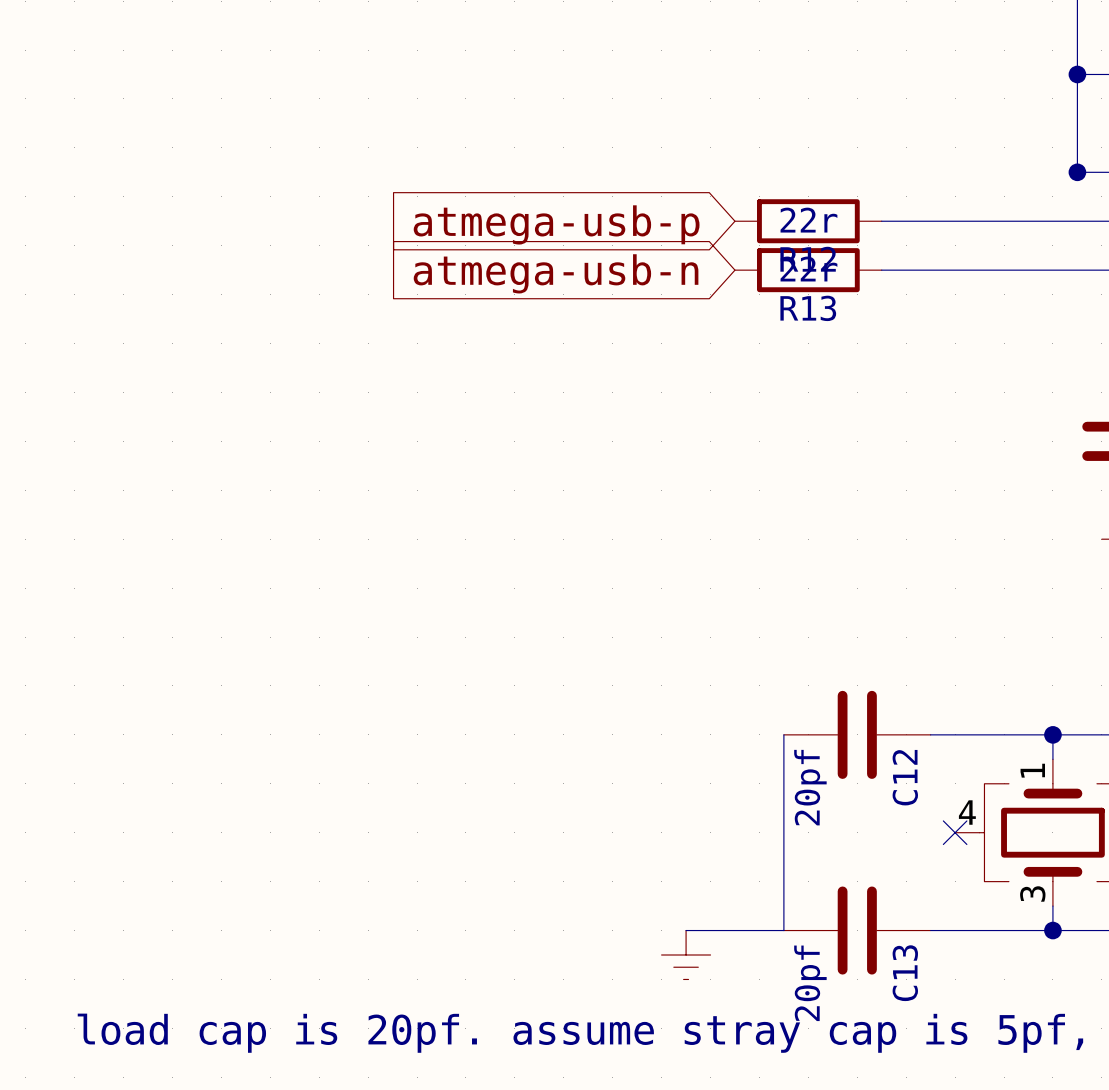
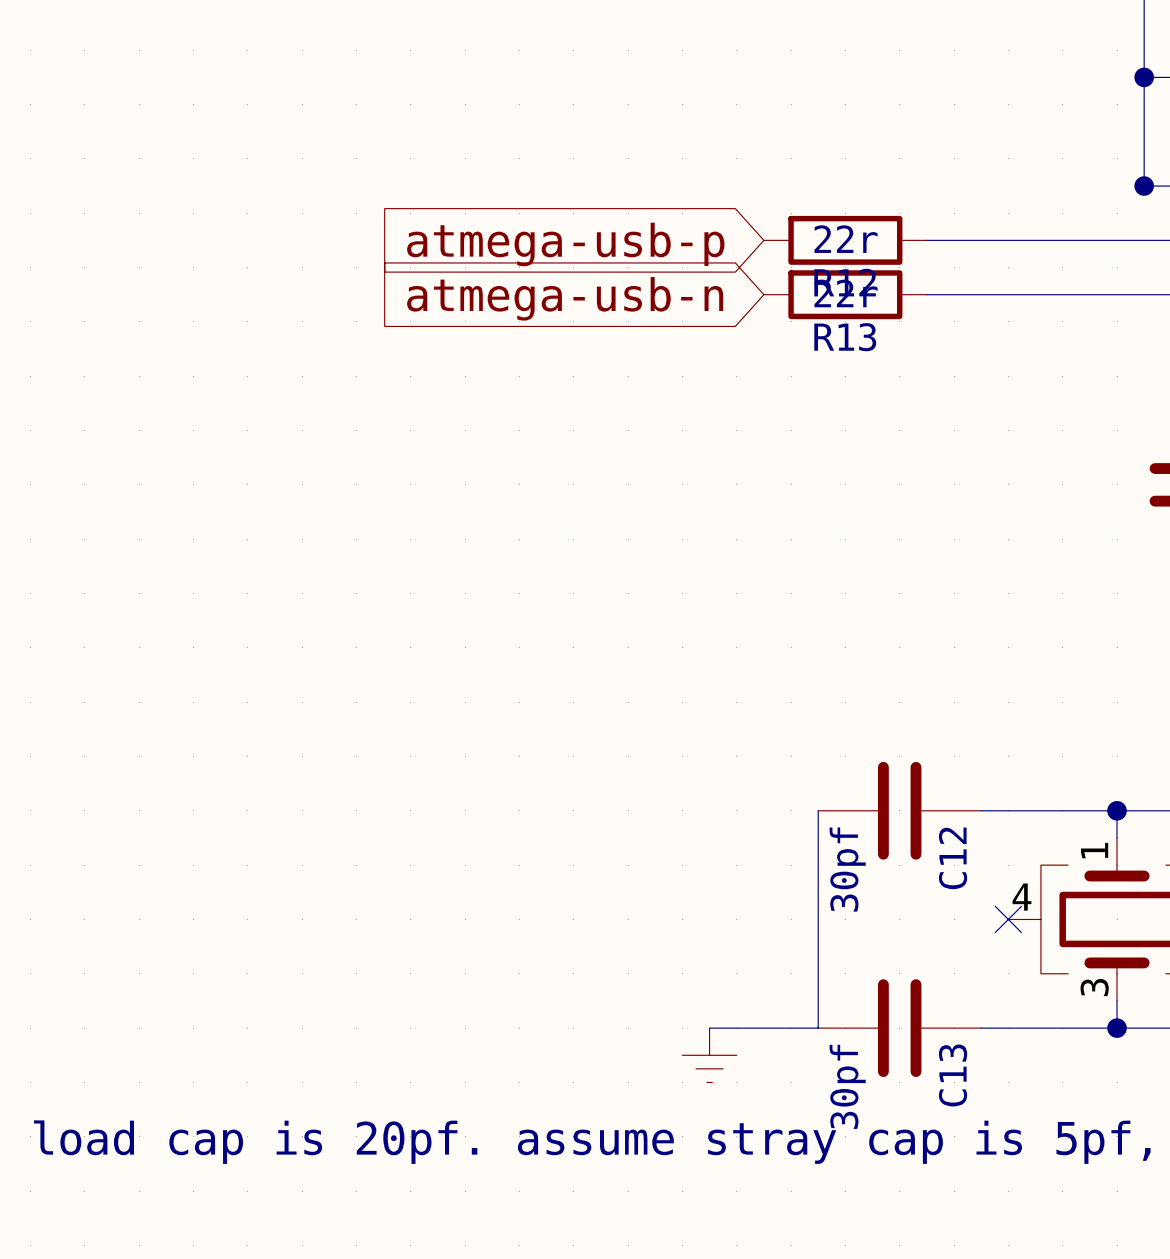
C12 value: 20pf (810, 787) -> 30pf (847, 869)
C13 value: 20pf (810, 983) -> 30pf (847, 1086)

